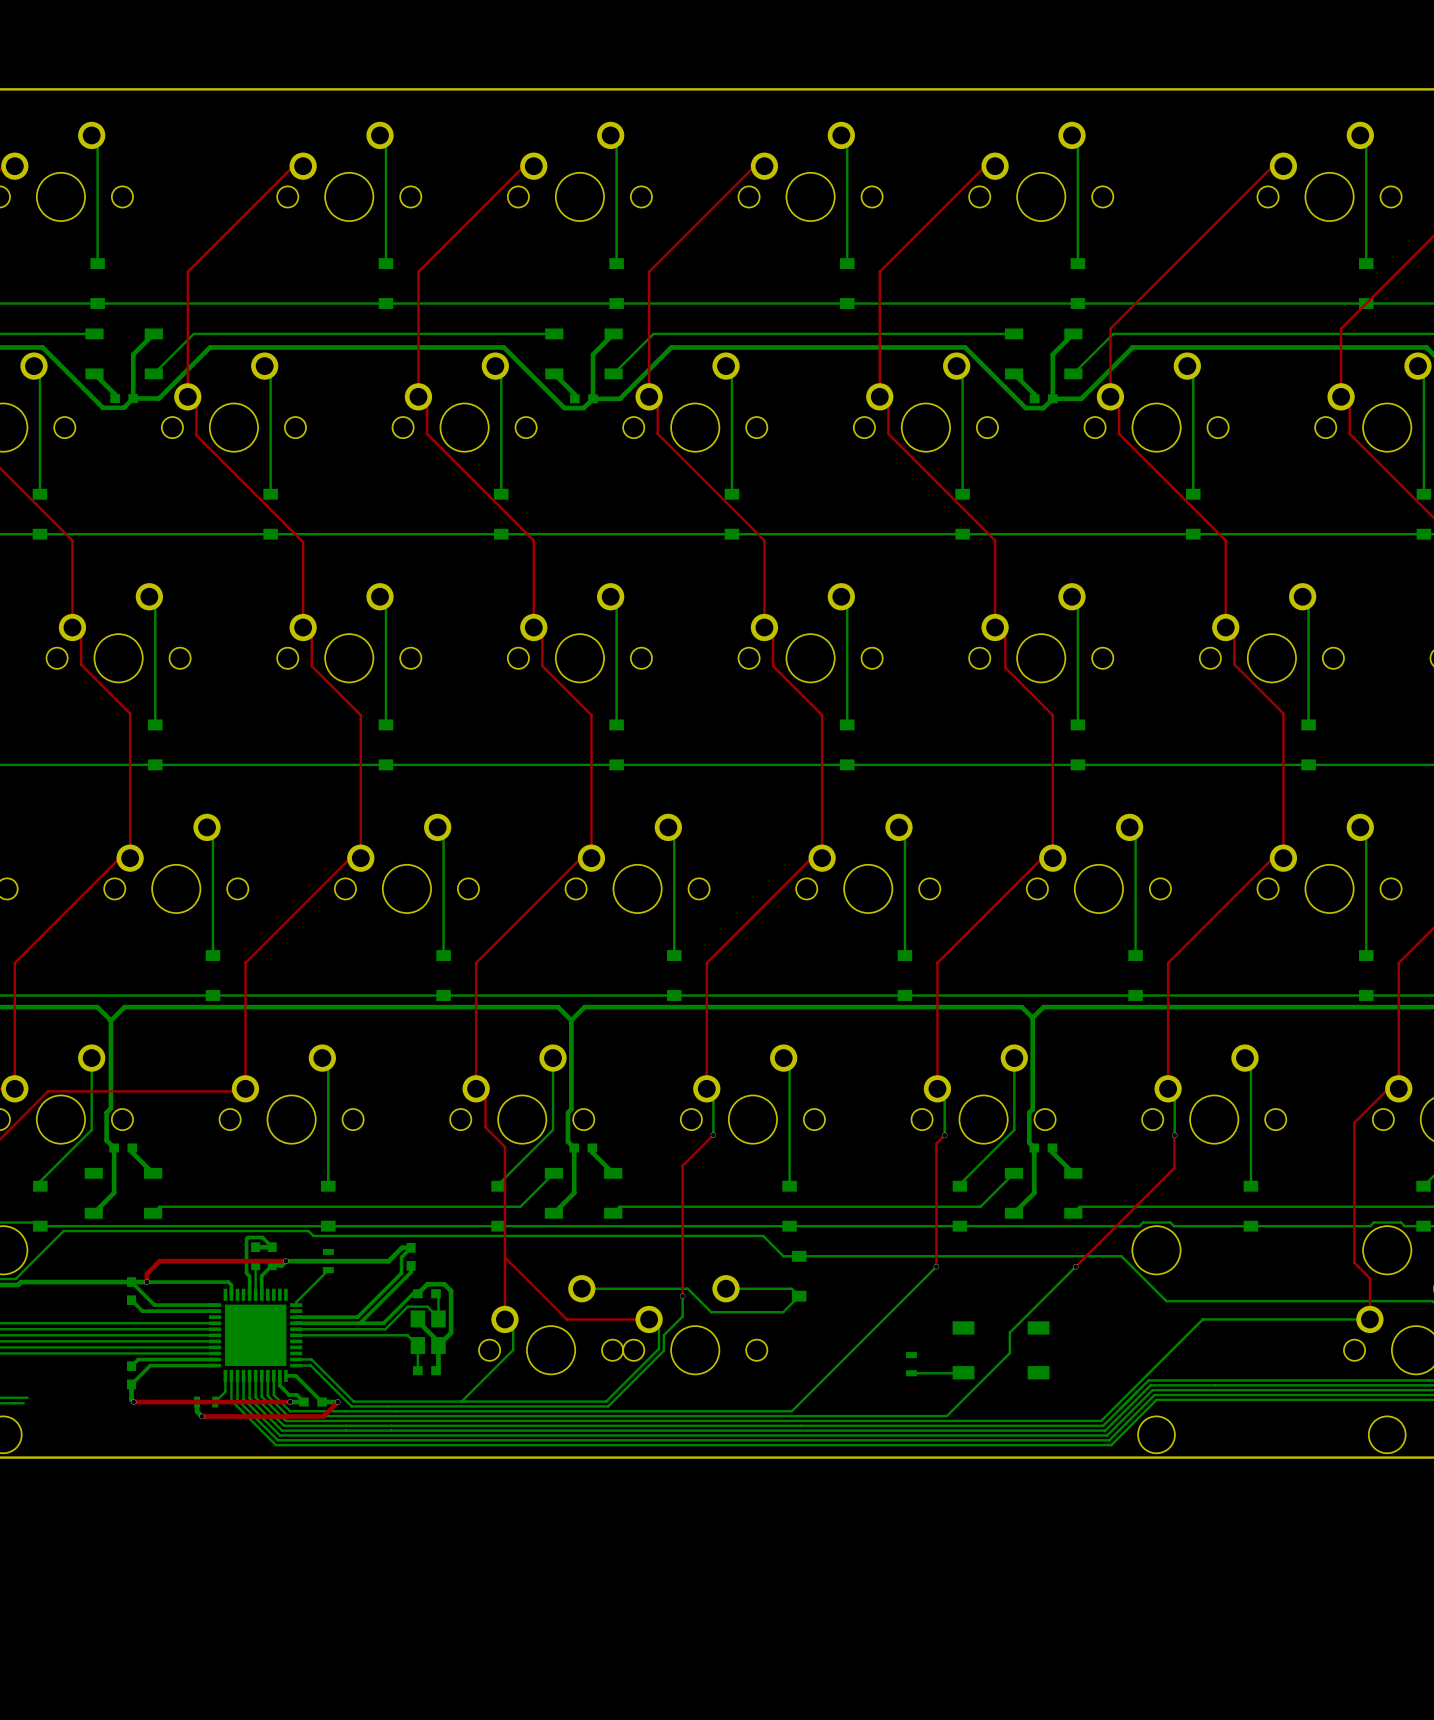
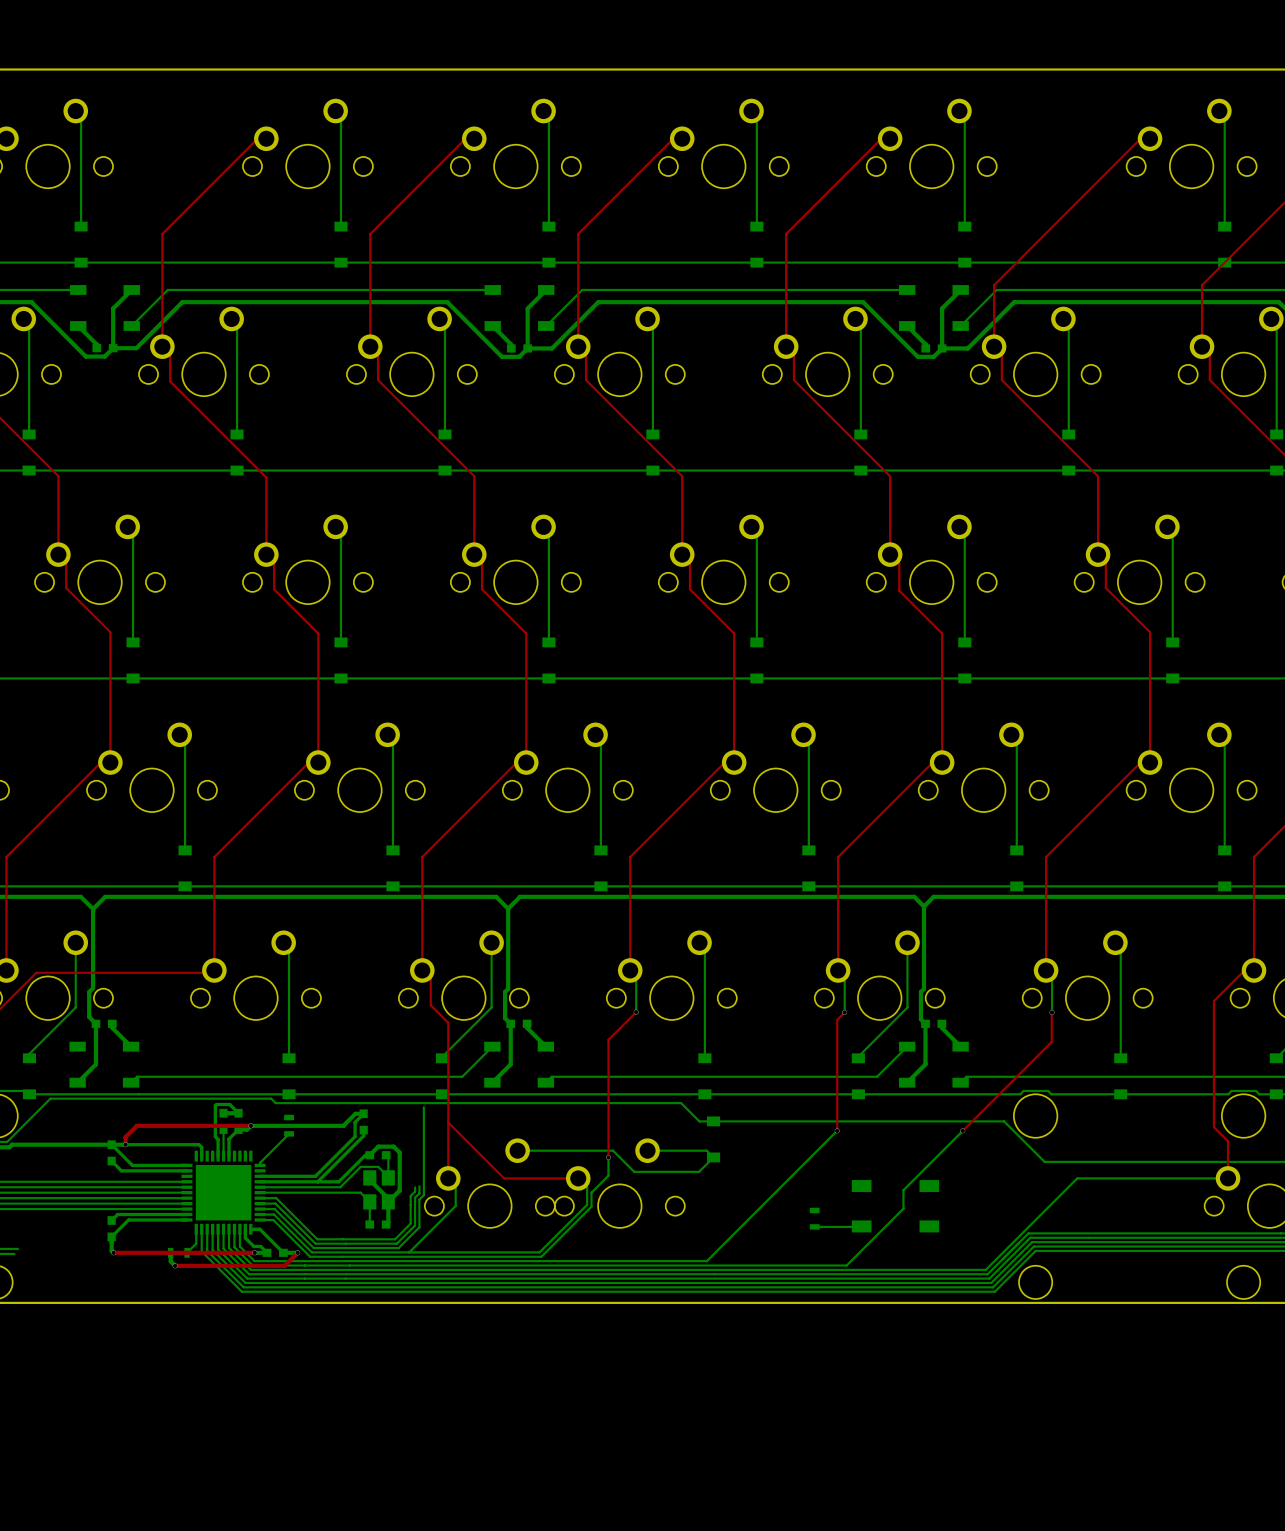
bottom track: none -> (423, 1107) (423, 1195) (419, 1199) (419, 1227) (398, 1248) (313, 1248) (274, 1209) (260, 1209)
bottom track: none -> (419, 1186) (419, 1193) (415, 1197) (415, 1225) (396, 1243) (315, 1243) (275, 1203) (260, 1203)
bottom track: none -> (415, 1187) (415, 1191) (410, 1195) (410, 1223) (395, 1239) (317, 1239) (276, 1198) (260, 1198)

